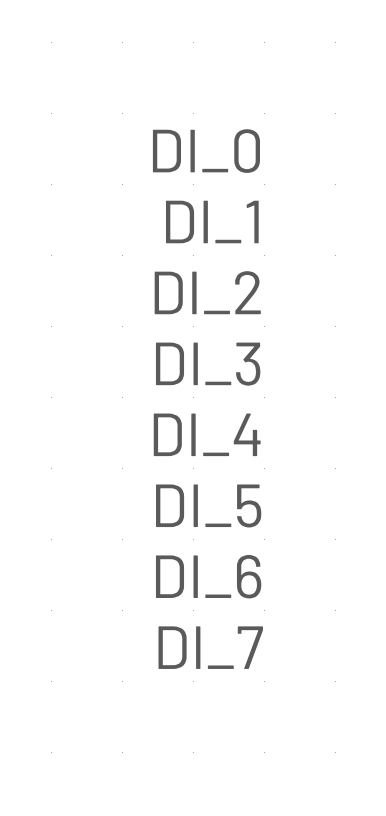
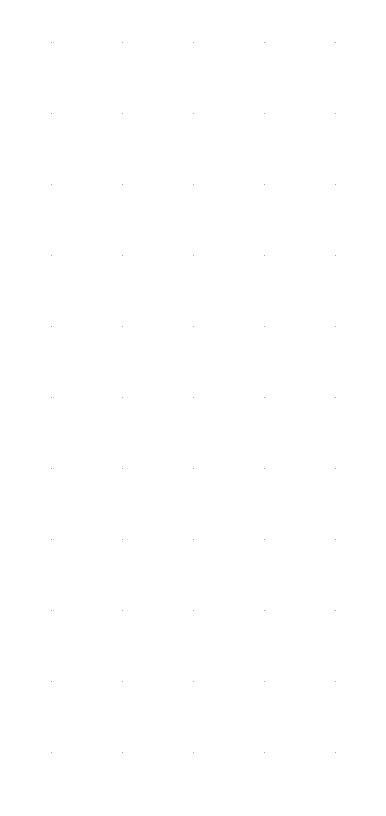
text: DI_0 (206, 151) -> none
text: DI_1 (212, 221) -> none
text: DI_2 (207, 292) -> none
text: DI_3 (208, 364) -> none
text: DI_4 (207, 434) -> none
text: DI_5 (208, 505) -> none
text: DI_6 (208, 576) -> none
text: DI_7 (210, 647) -> none

